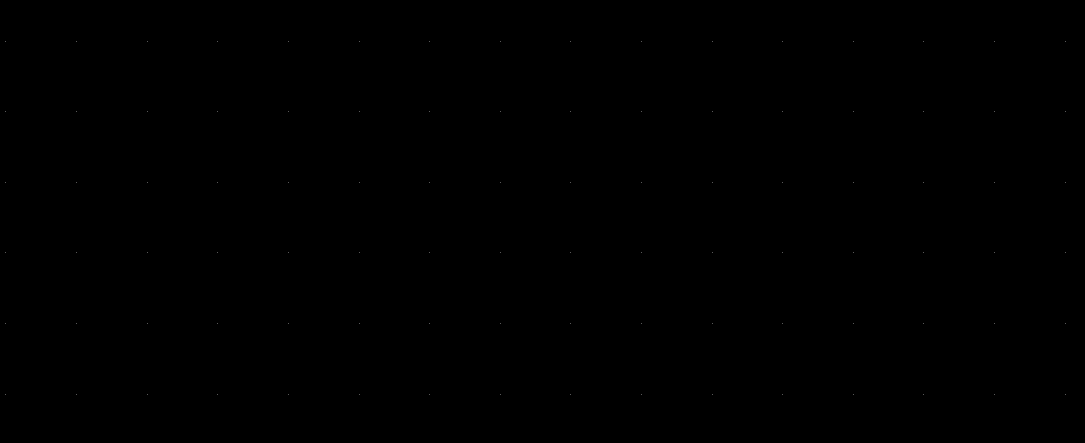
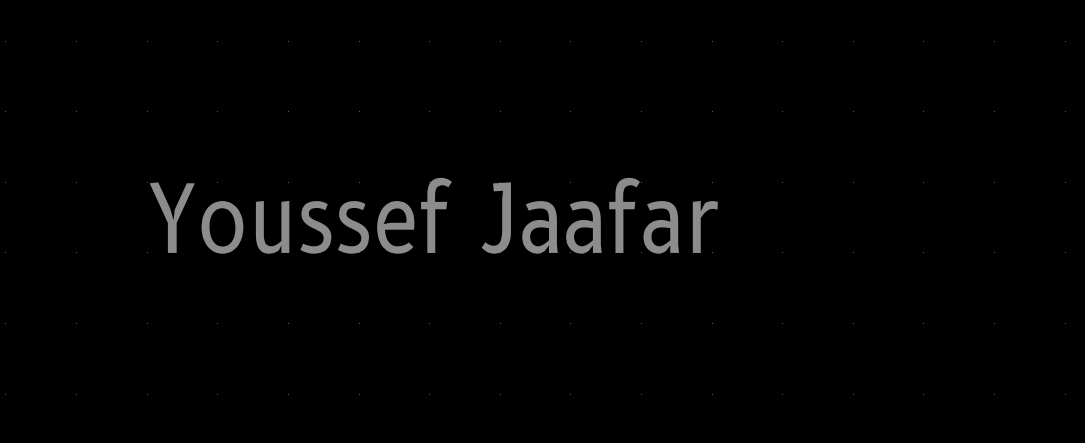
text: none -> Youssef Jaafar (433, 215)

